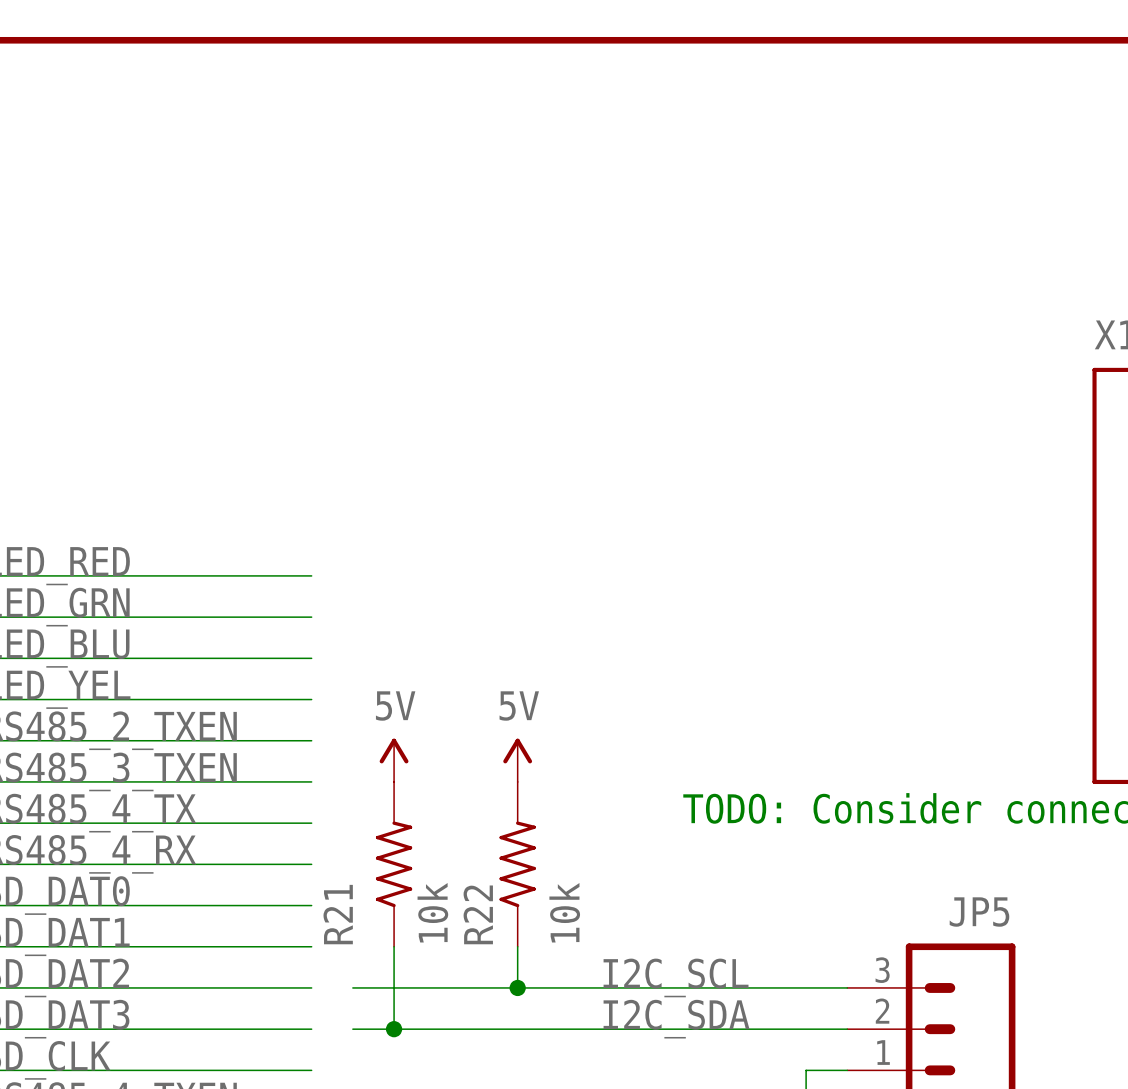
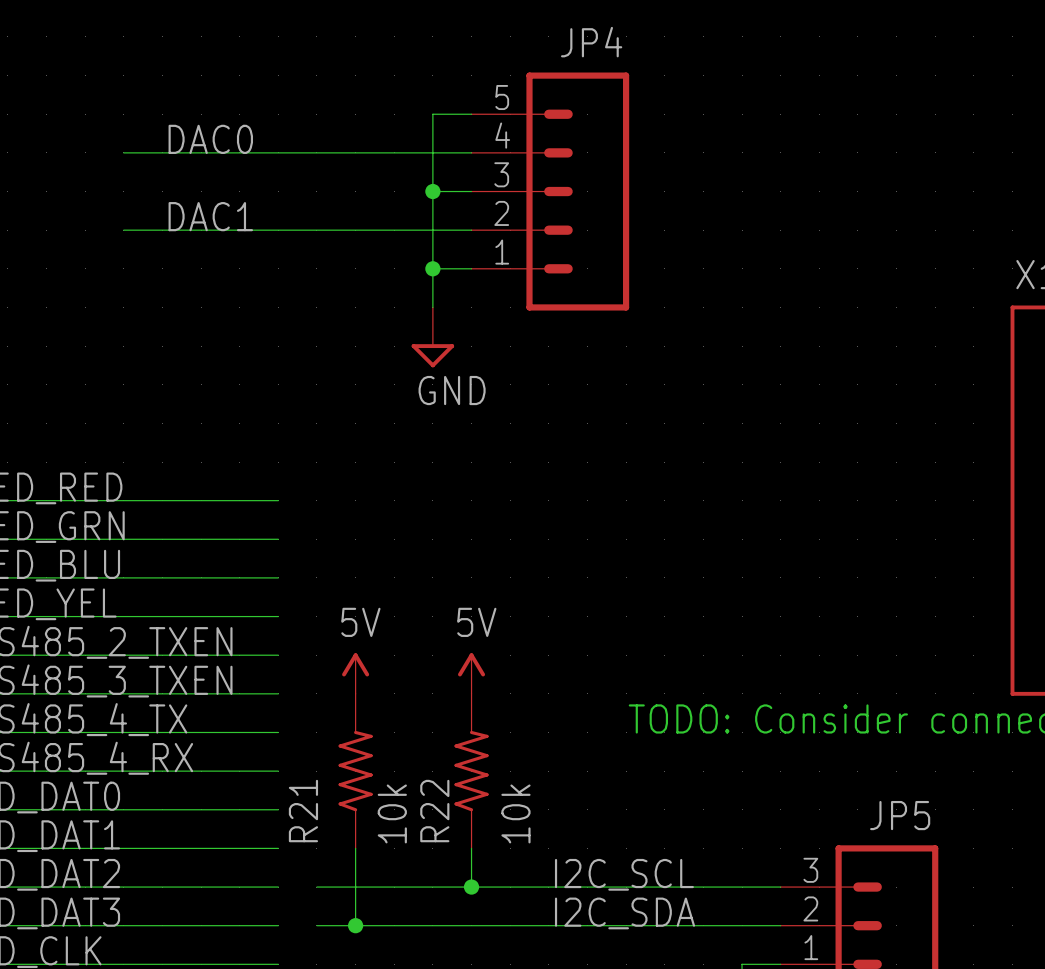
wire: none -> (471, 114) (432, 114) (432, 307)
label: none -> DAC0 (210, 139)
wire: none -> (123, 152) (471, 152)
wire: none -> (432, 191) (471, 191)
junction: none -> (432, 191)
JP4: none -> (550, 191)
label: none -> DAC1 (210, 216)
wire: none -> (123, 230) (471, 230)
wire: none -> (432, 268) (471, 268)
junction: none -> (432, 268)
power symbol: none -> GND (432, 337)

